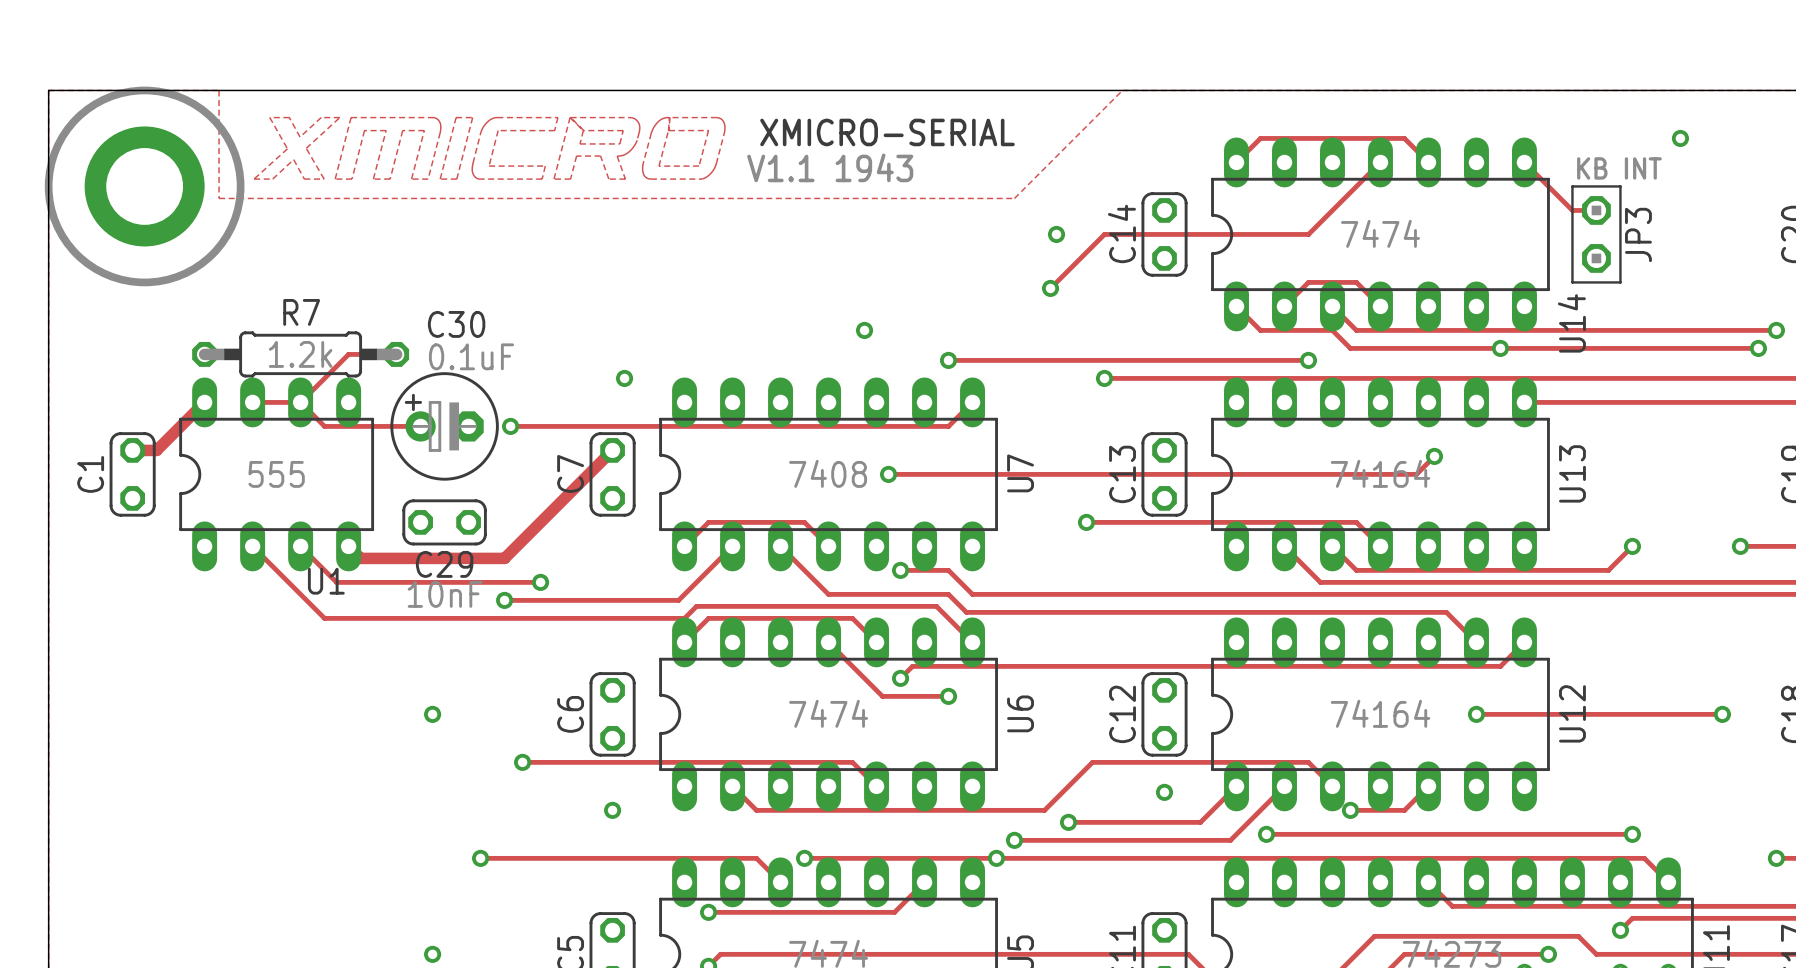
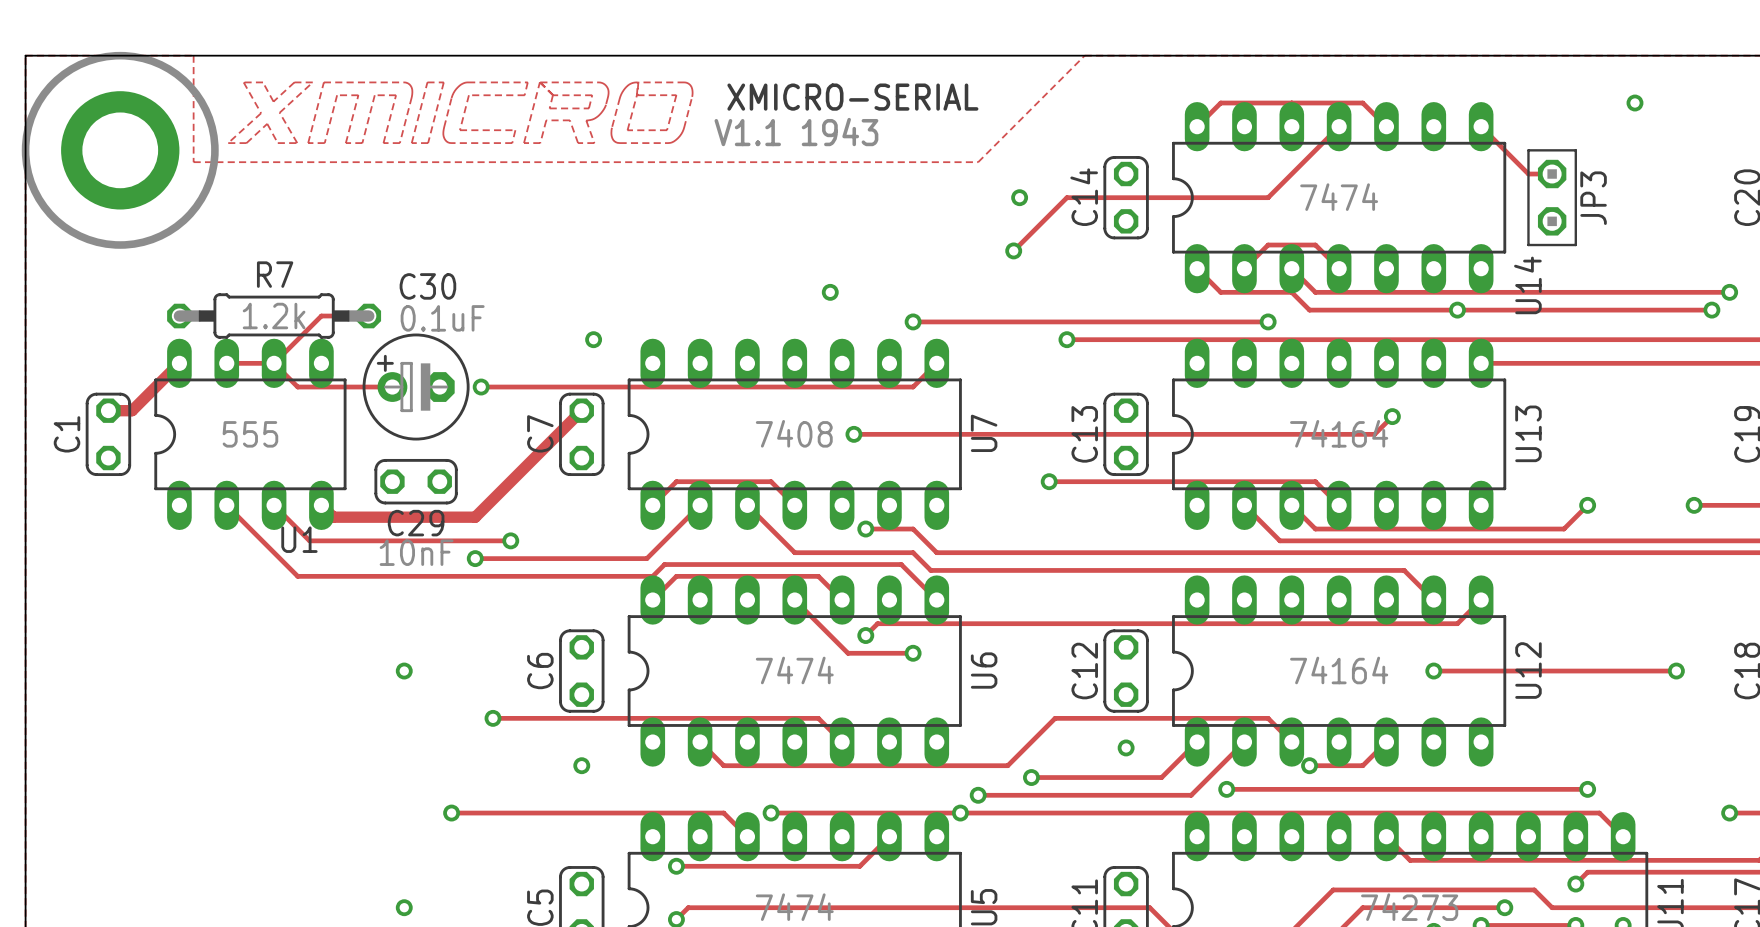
text: KB INT (1619, 168) -> none

